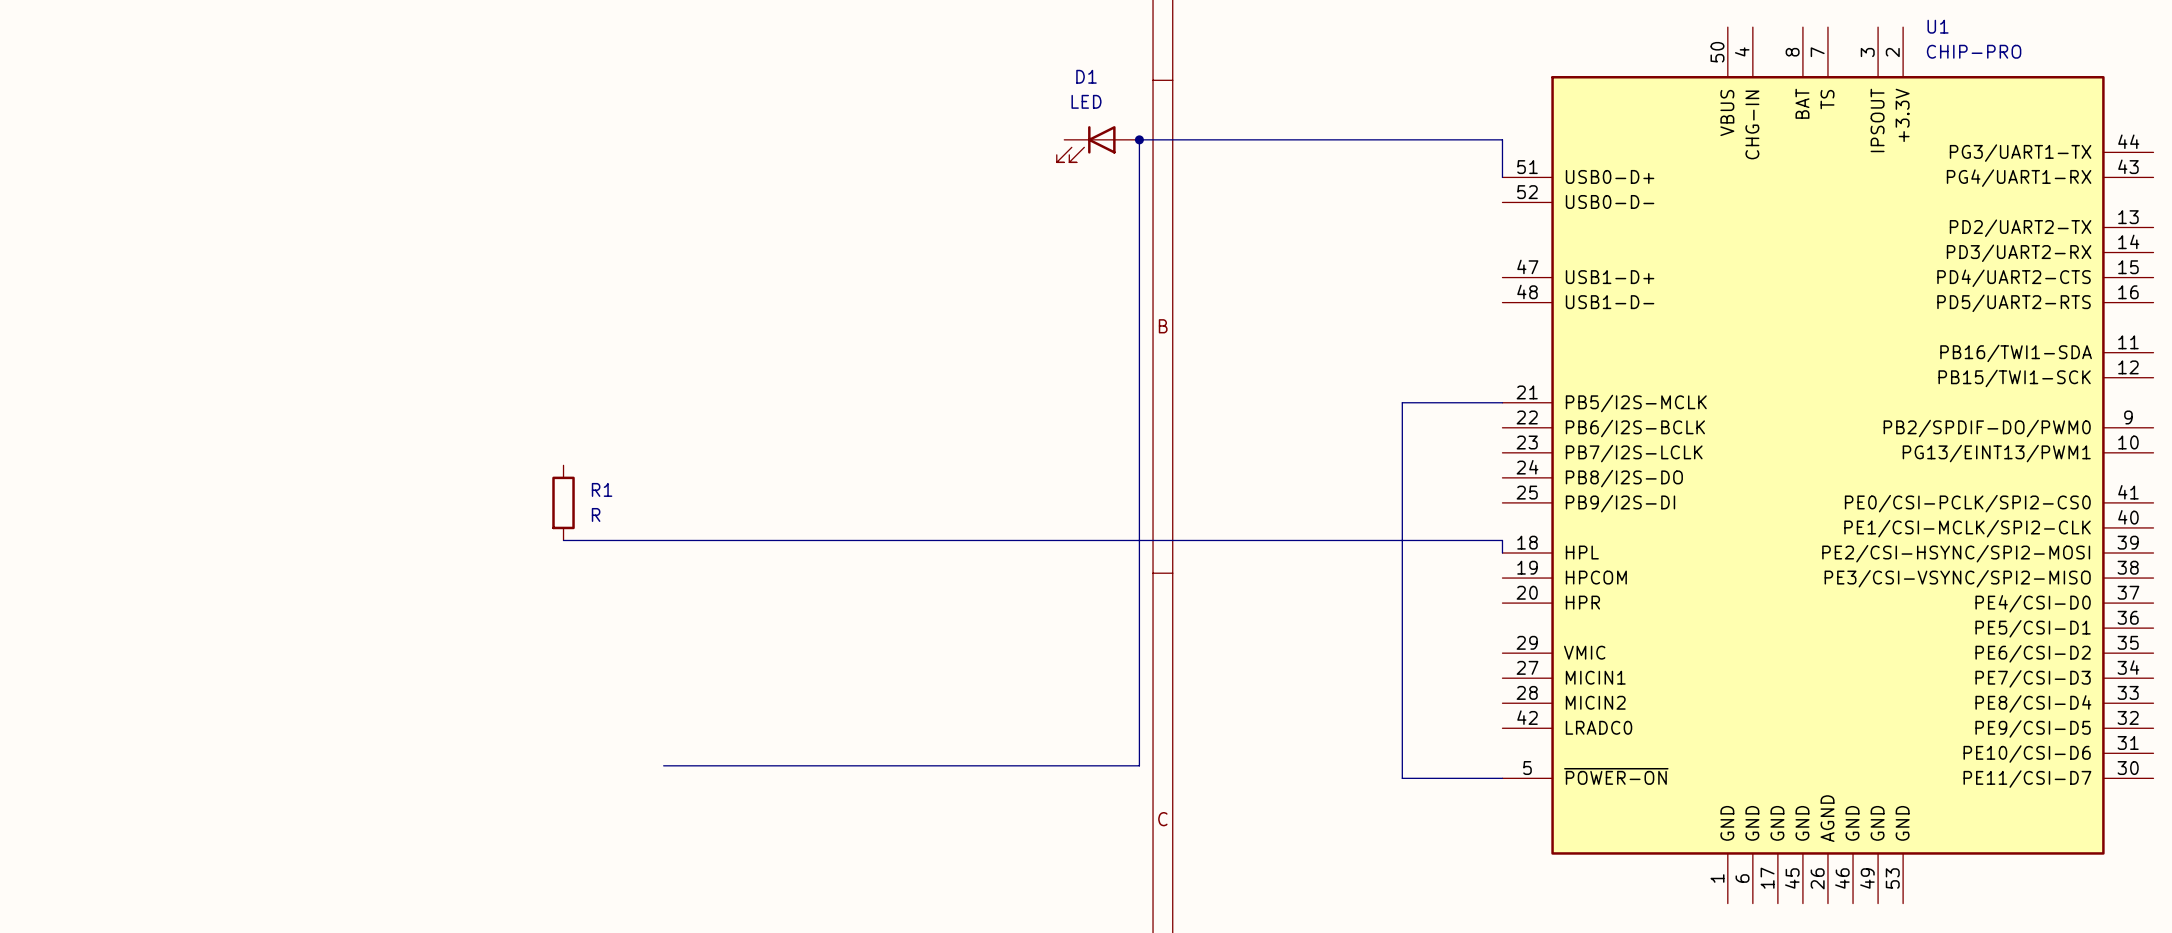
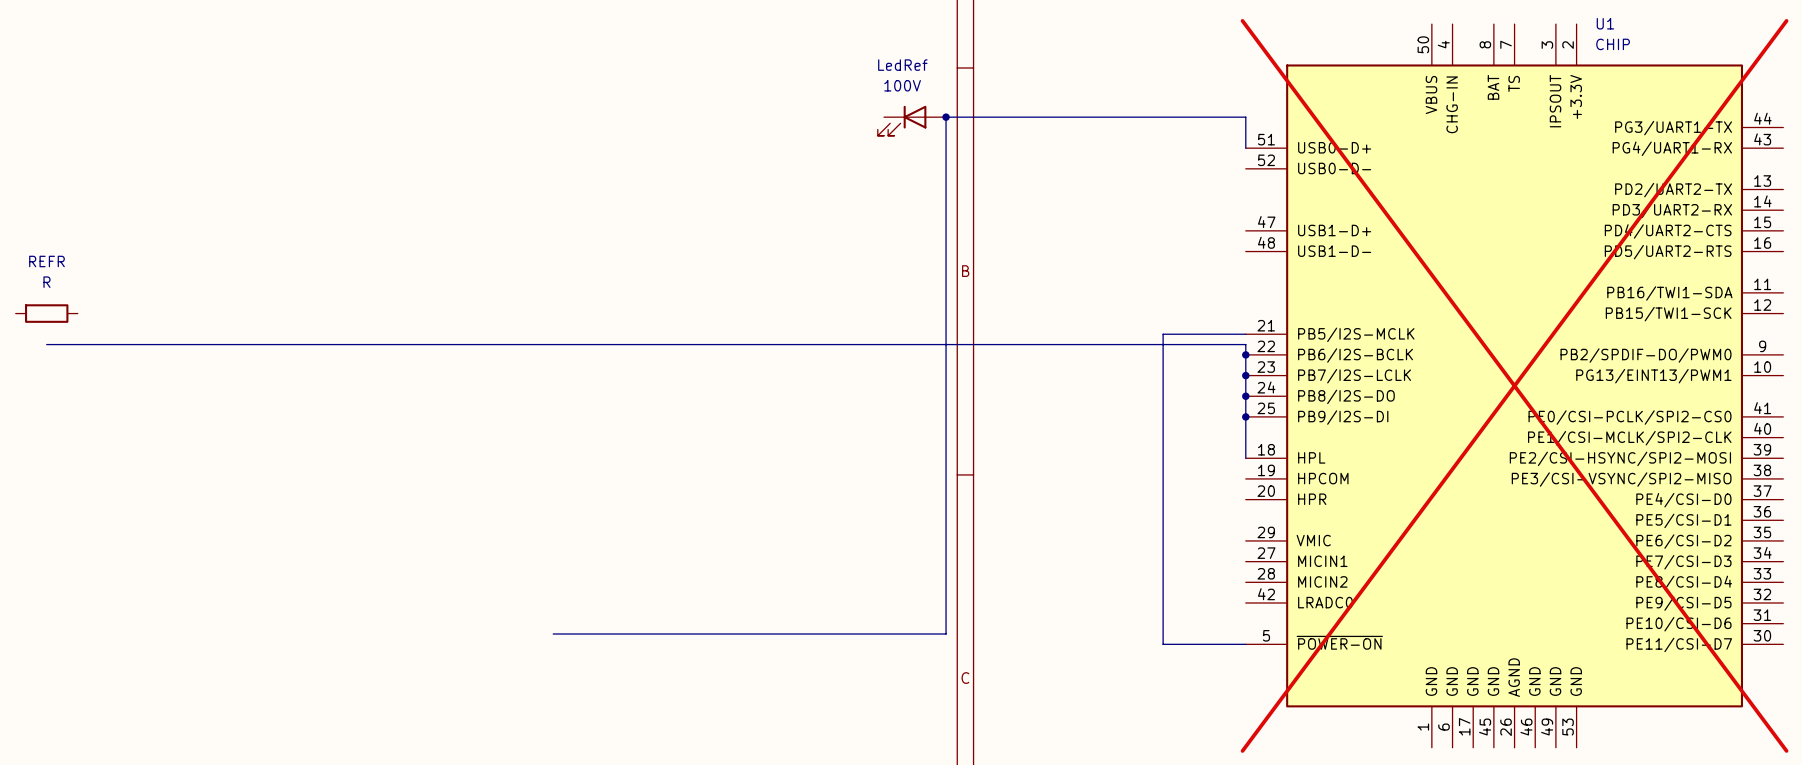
U1 value: CHIP-PRO (1974, 51) -> CHIP (1613, 44)
D1 name: D1 (1086, 76) -> LedRef (902, 65)
D1 value: LED (1086, 101) -> 100V (902, 85)
REFR: none -> R (46, 313)
junction: none -> (1245, 354)
junction: none -> (1245, 375)
U1 do-not-place cross: none -> (1514, 385)
junction: none -> (1245, 396)
R1: R (563, 502) -> none
junction: none -> (1245, 416)
wire: (563, 540) (1502, 540) -> (46, 344) (1245, 344) (1245, 447)

